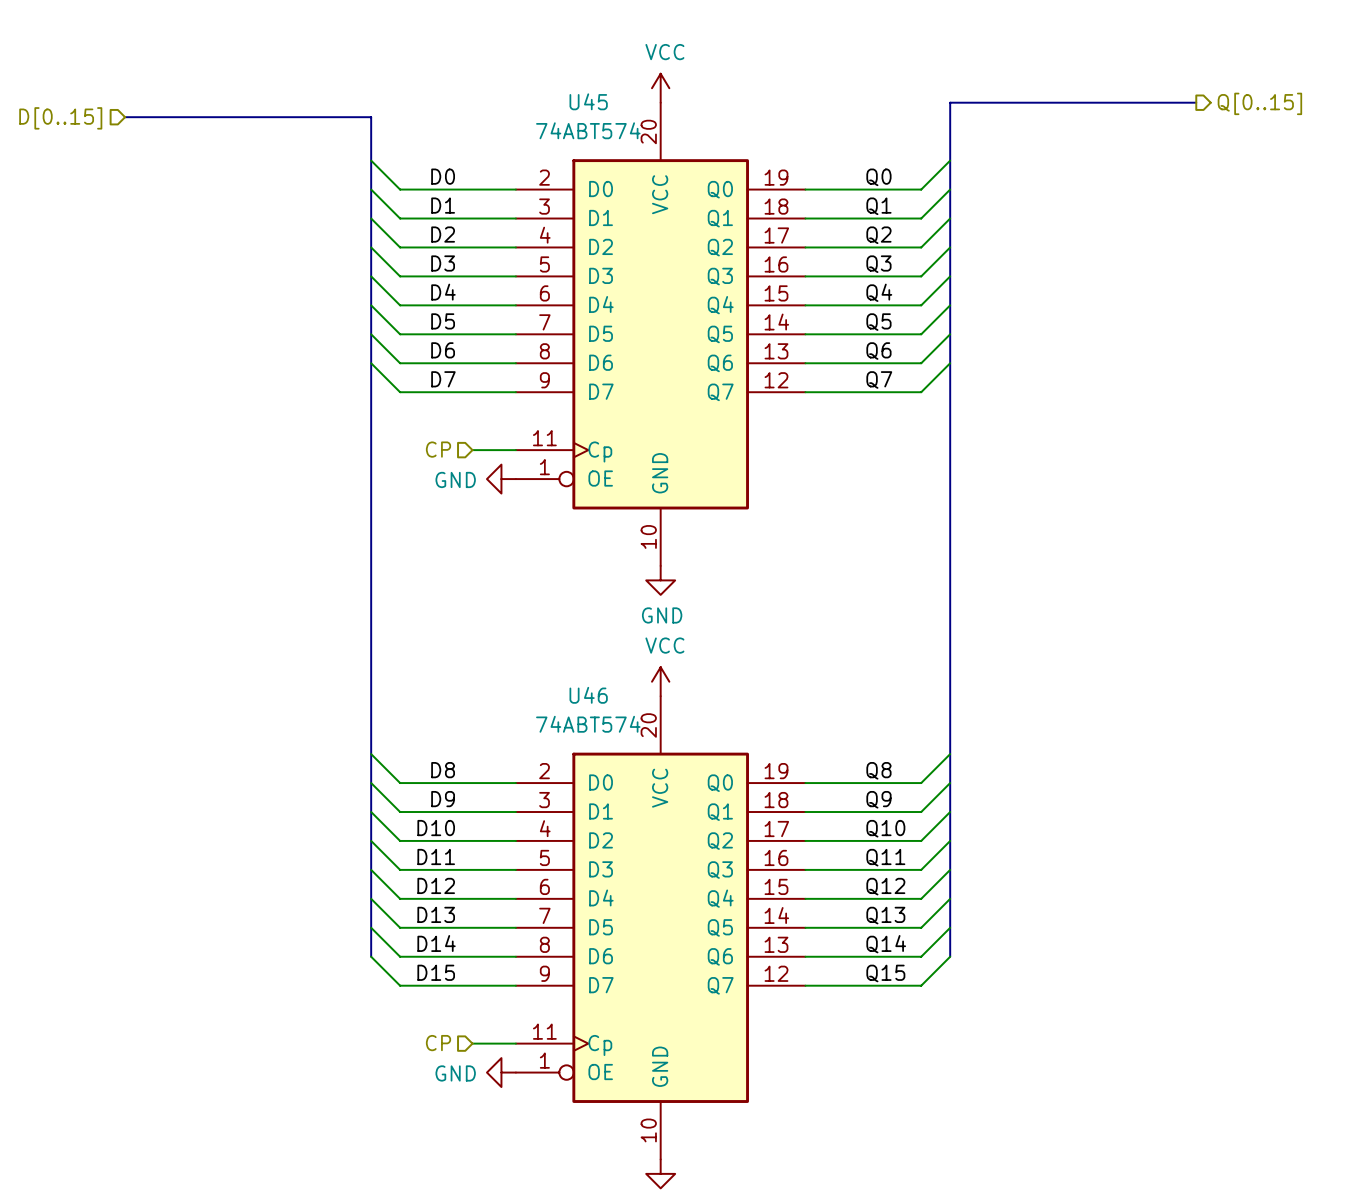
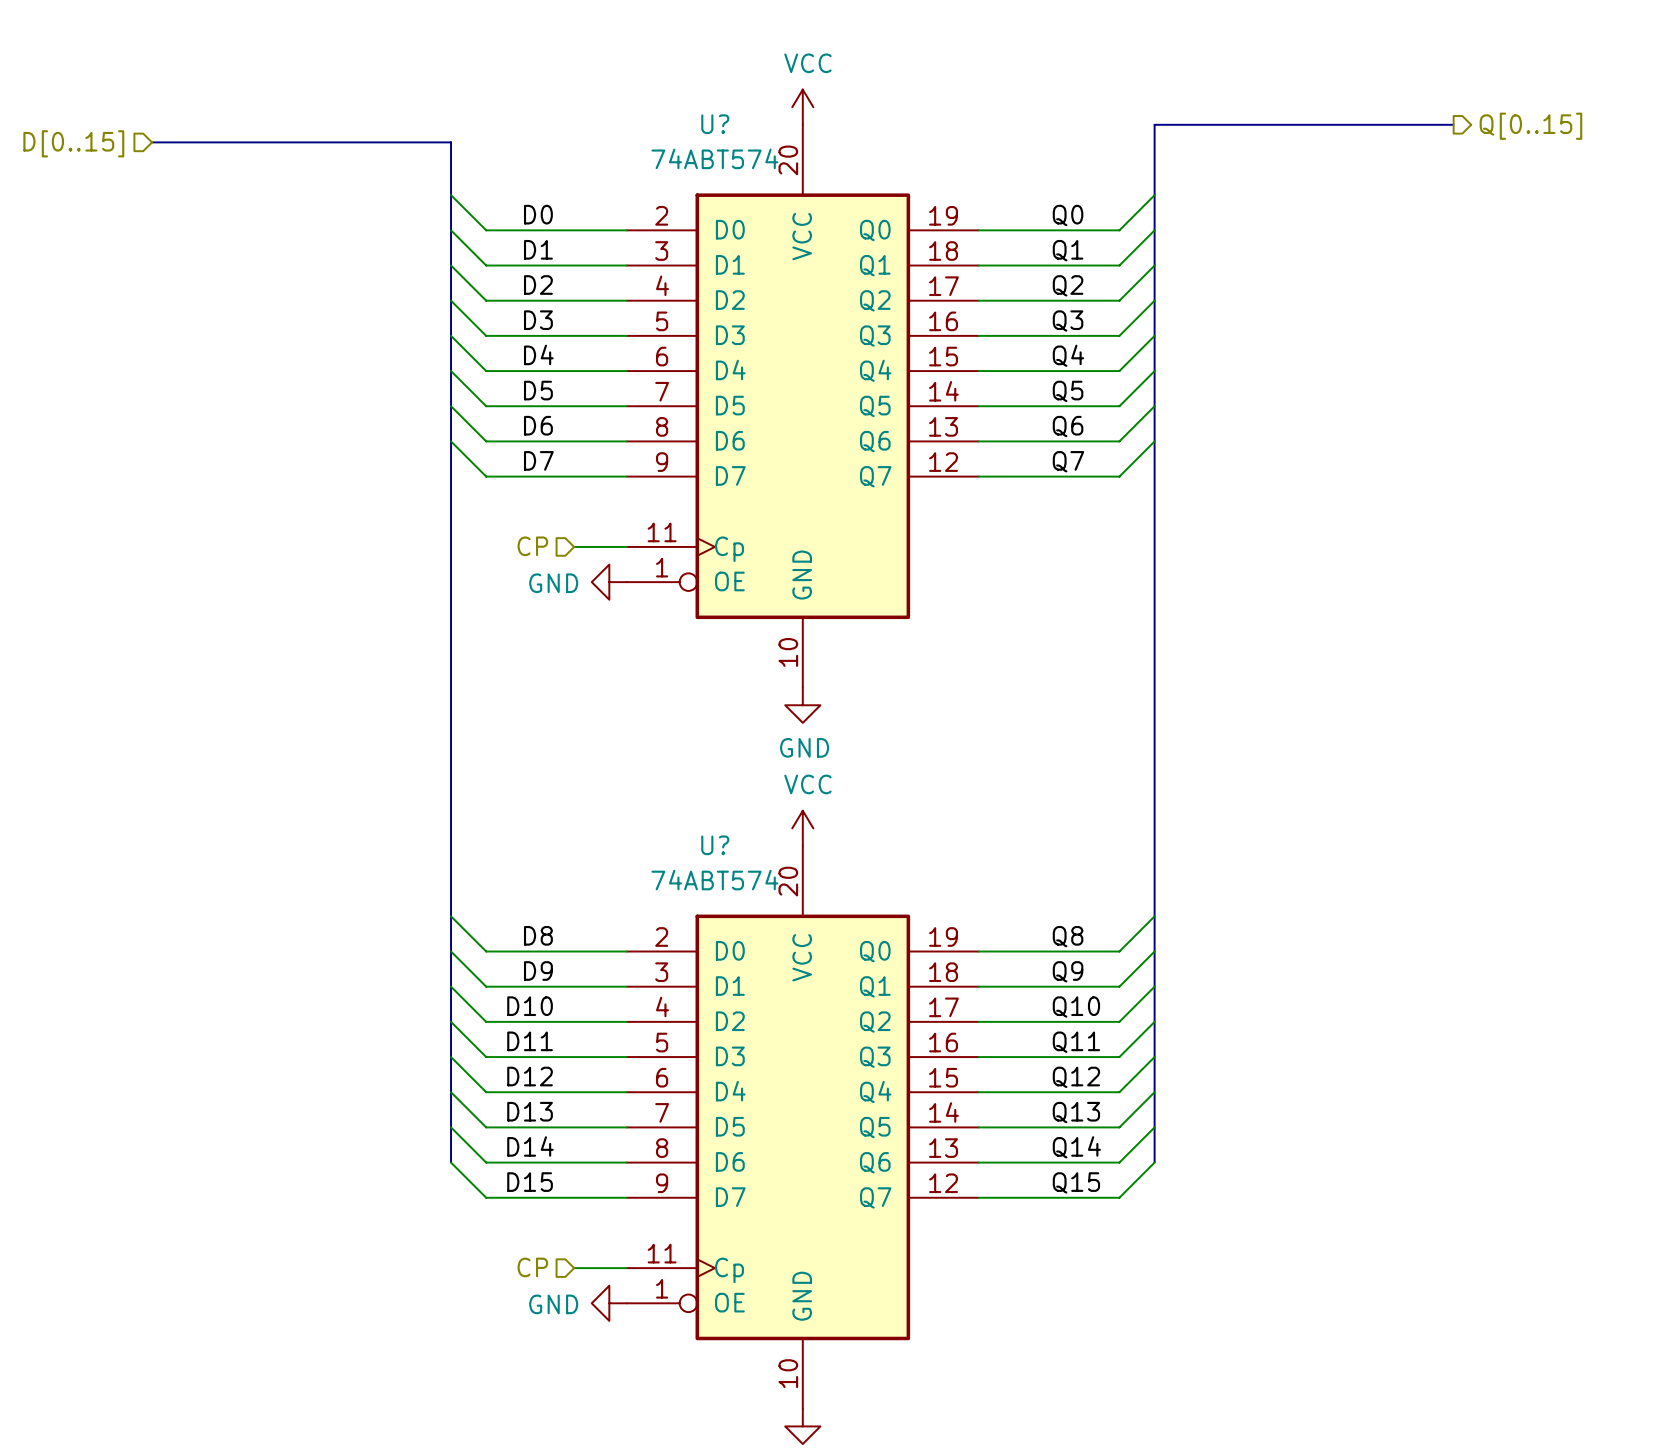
U45 name: U45 (588, 101) -> U? (715, 124)
U46 name: U46 (588, 695) -> U? (715, 845)

